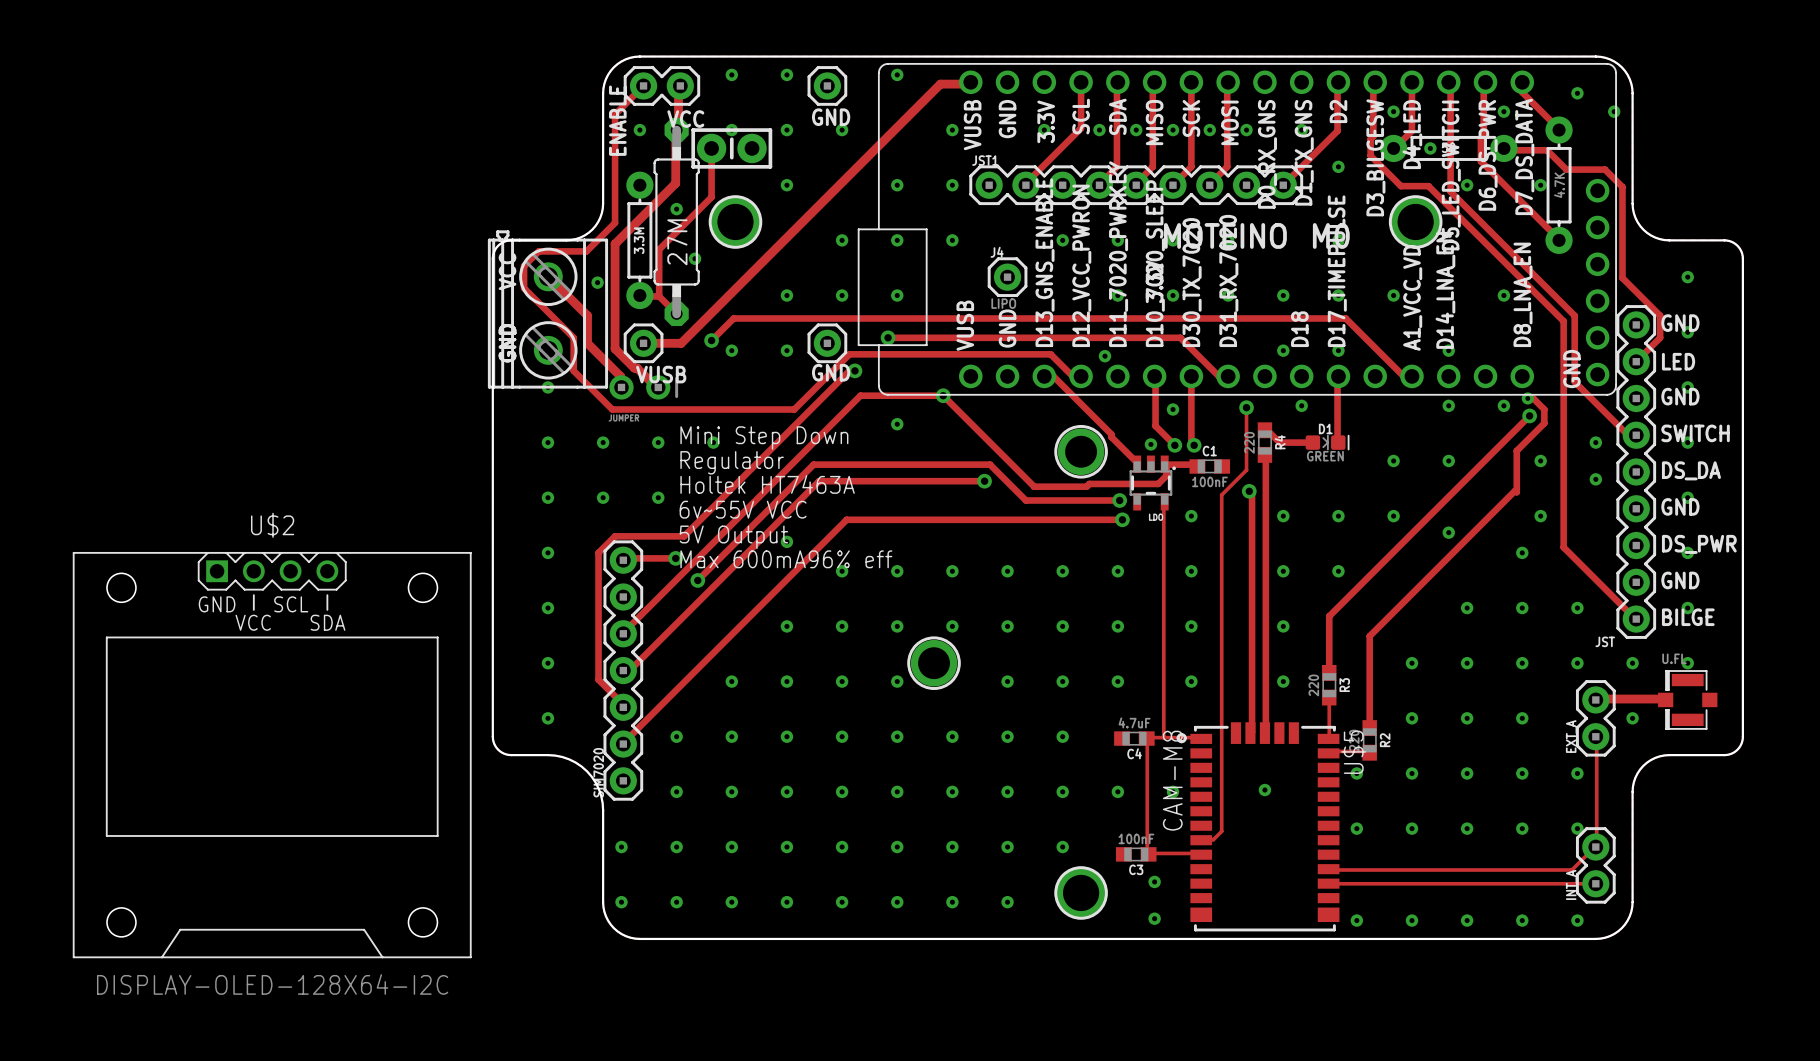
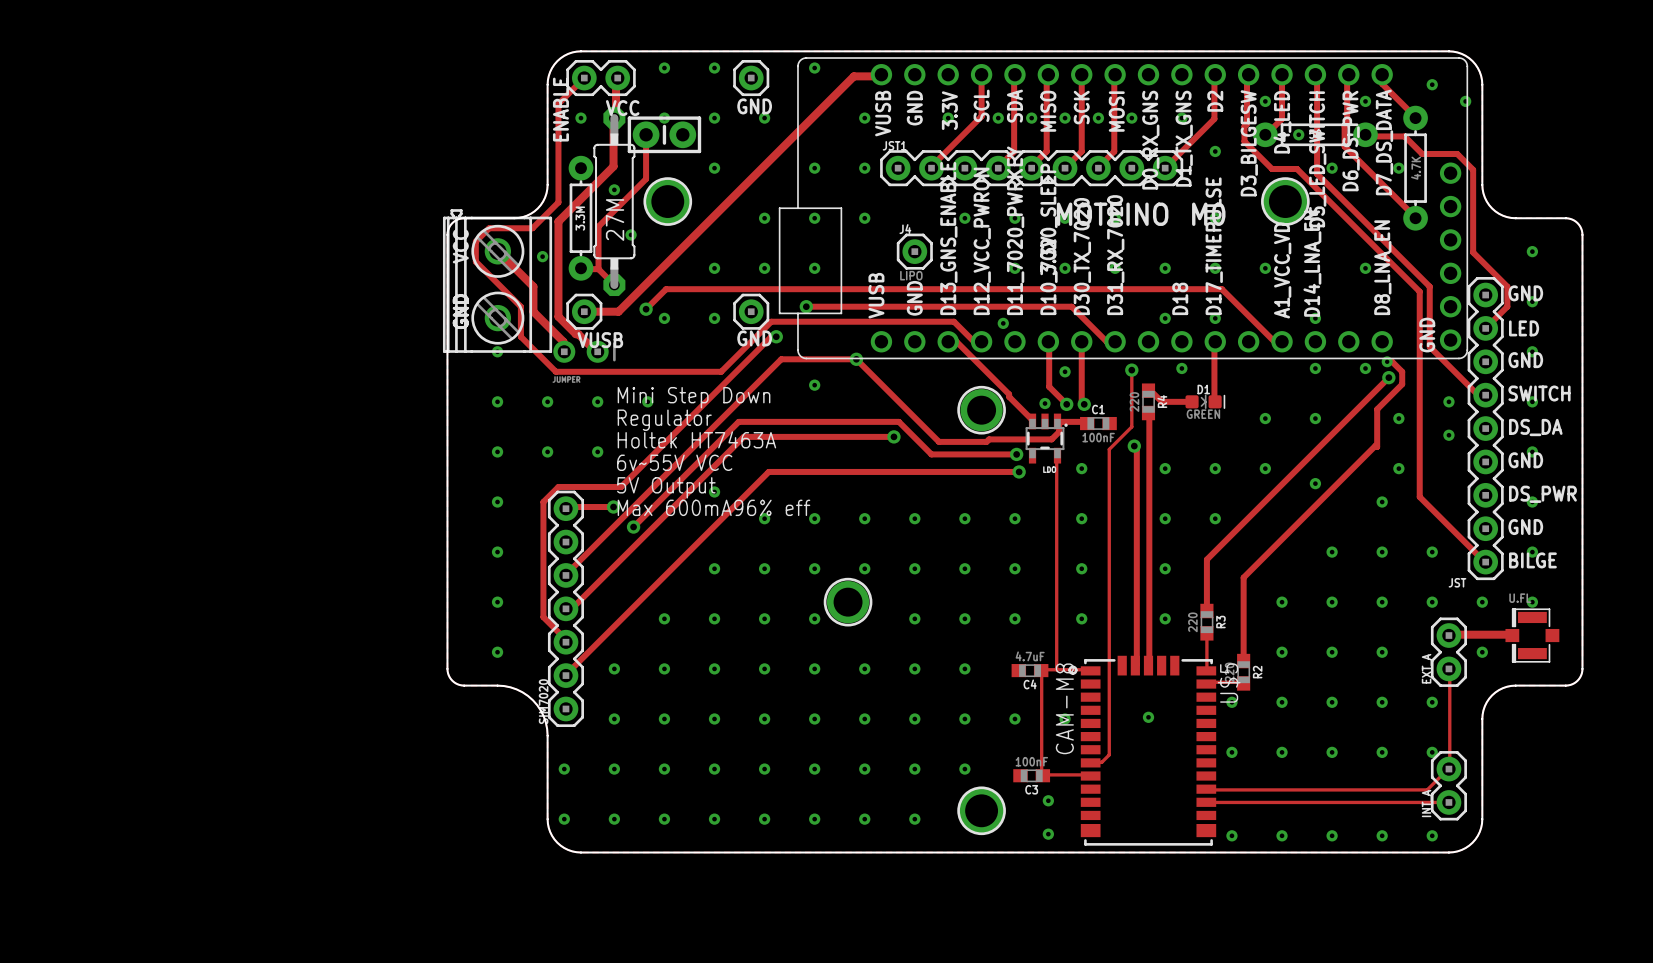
U$2: DISPLAY-OLED-128X64-I2C (272, 755) -> none

